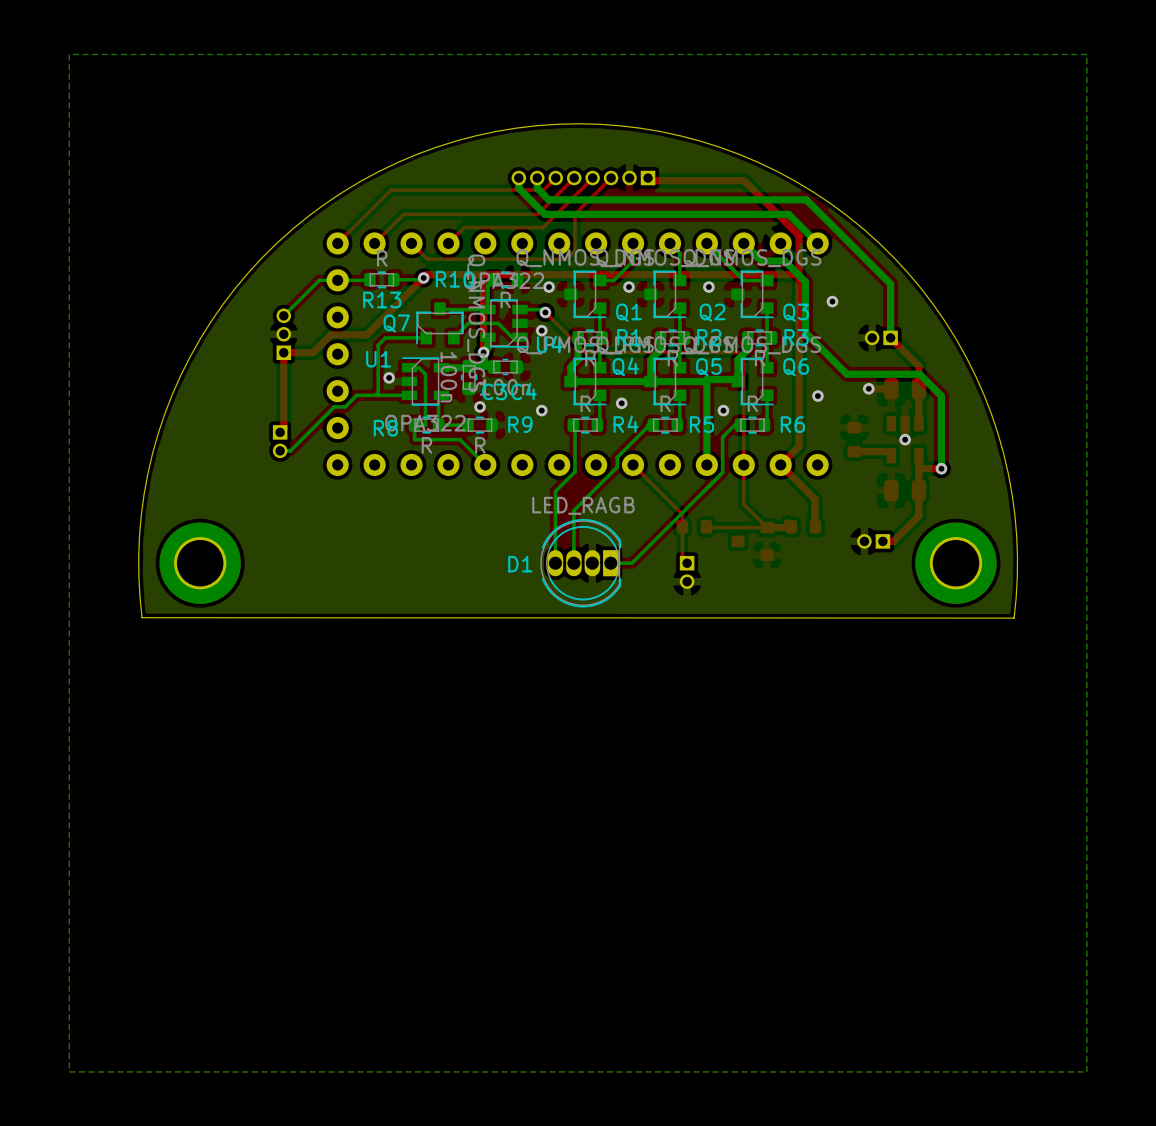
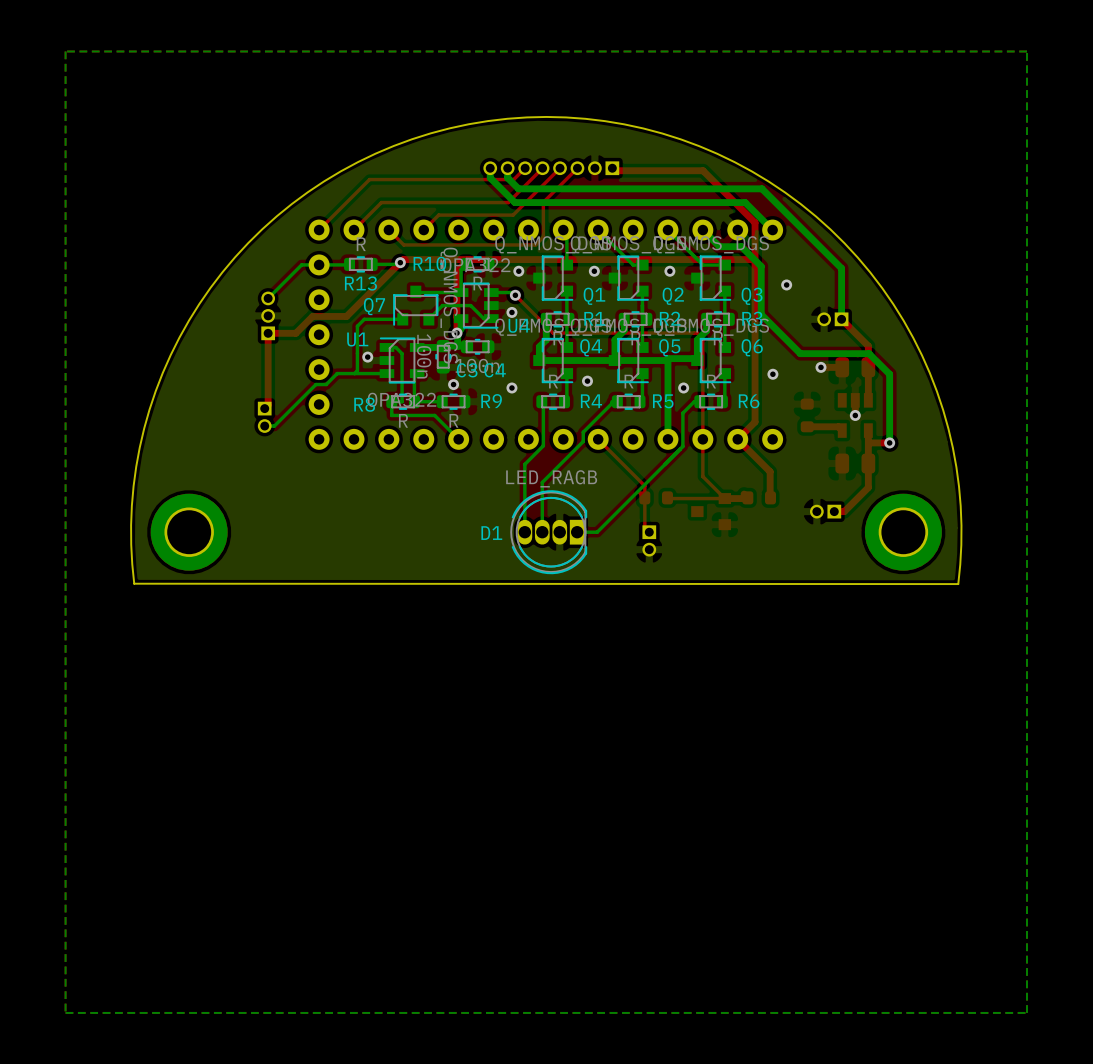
bottom track: (633, 243) (633, 261) (613, 280) (599, 280) -> (563, 230) (566, 233) (566, 265)
bottom track: (672, 246) (679, 253) (679, 280) -> (598, 230) (633, 265) (642, 265)

